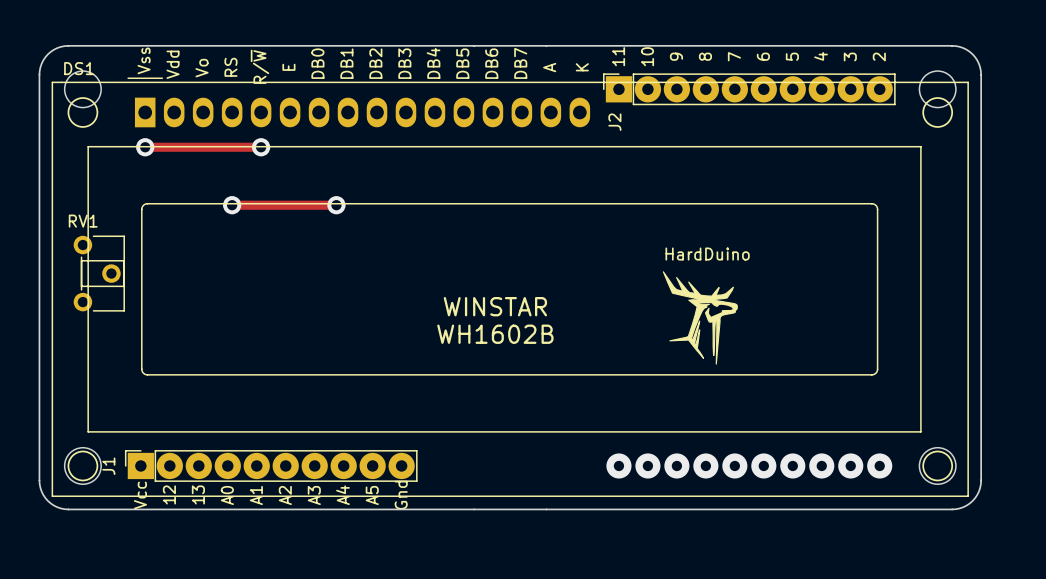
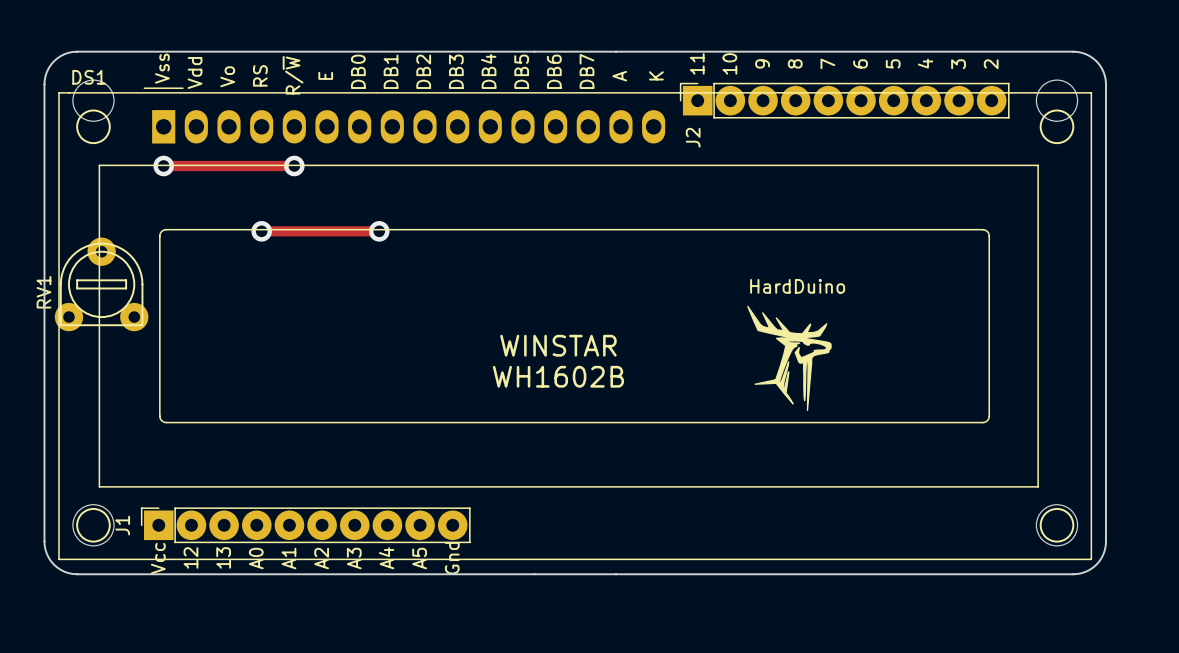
RV1 name position: RV1 (83, 221) -> RV1 (43, 292)
RV1 footprint: [73, 235, 125, 312] -> [54, 237, 149, 332]
via: (618, 465) -> none
via: (647, 465) -> none
via: (676, 465) -> none
via: (705, 465) -> none
via: (734, 465) -> none
via: (763, 465) -> none
via: (792, 465) -> none
via: (821, 465) -> none
via: (850, 465) -> none
via: (879, 465) -> none

